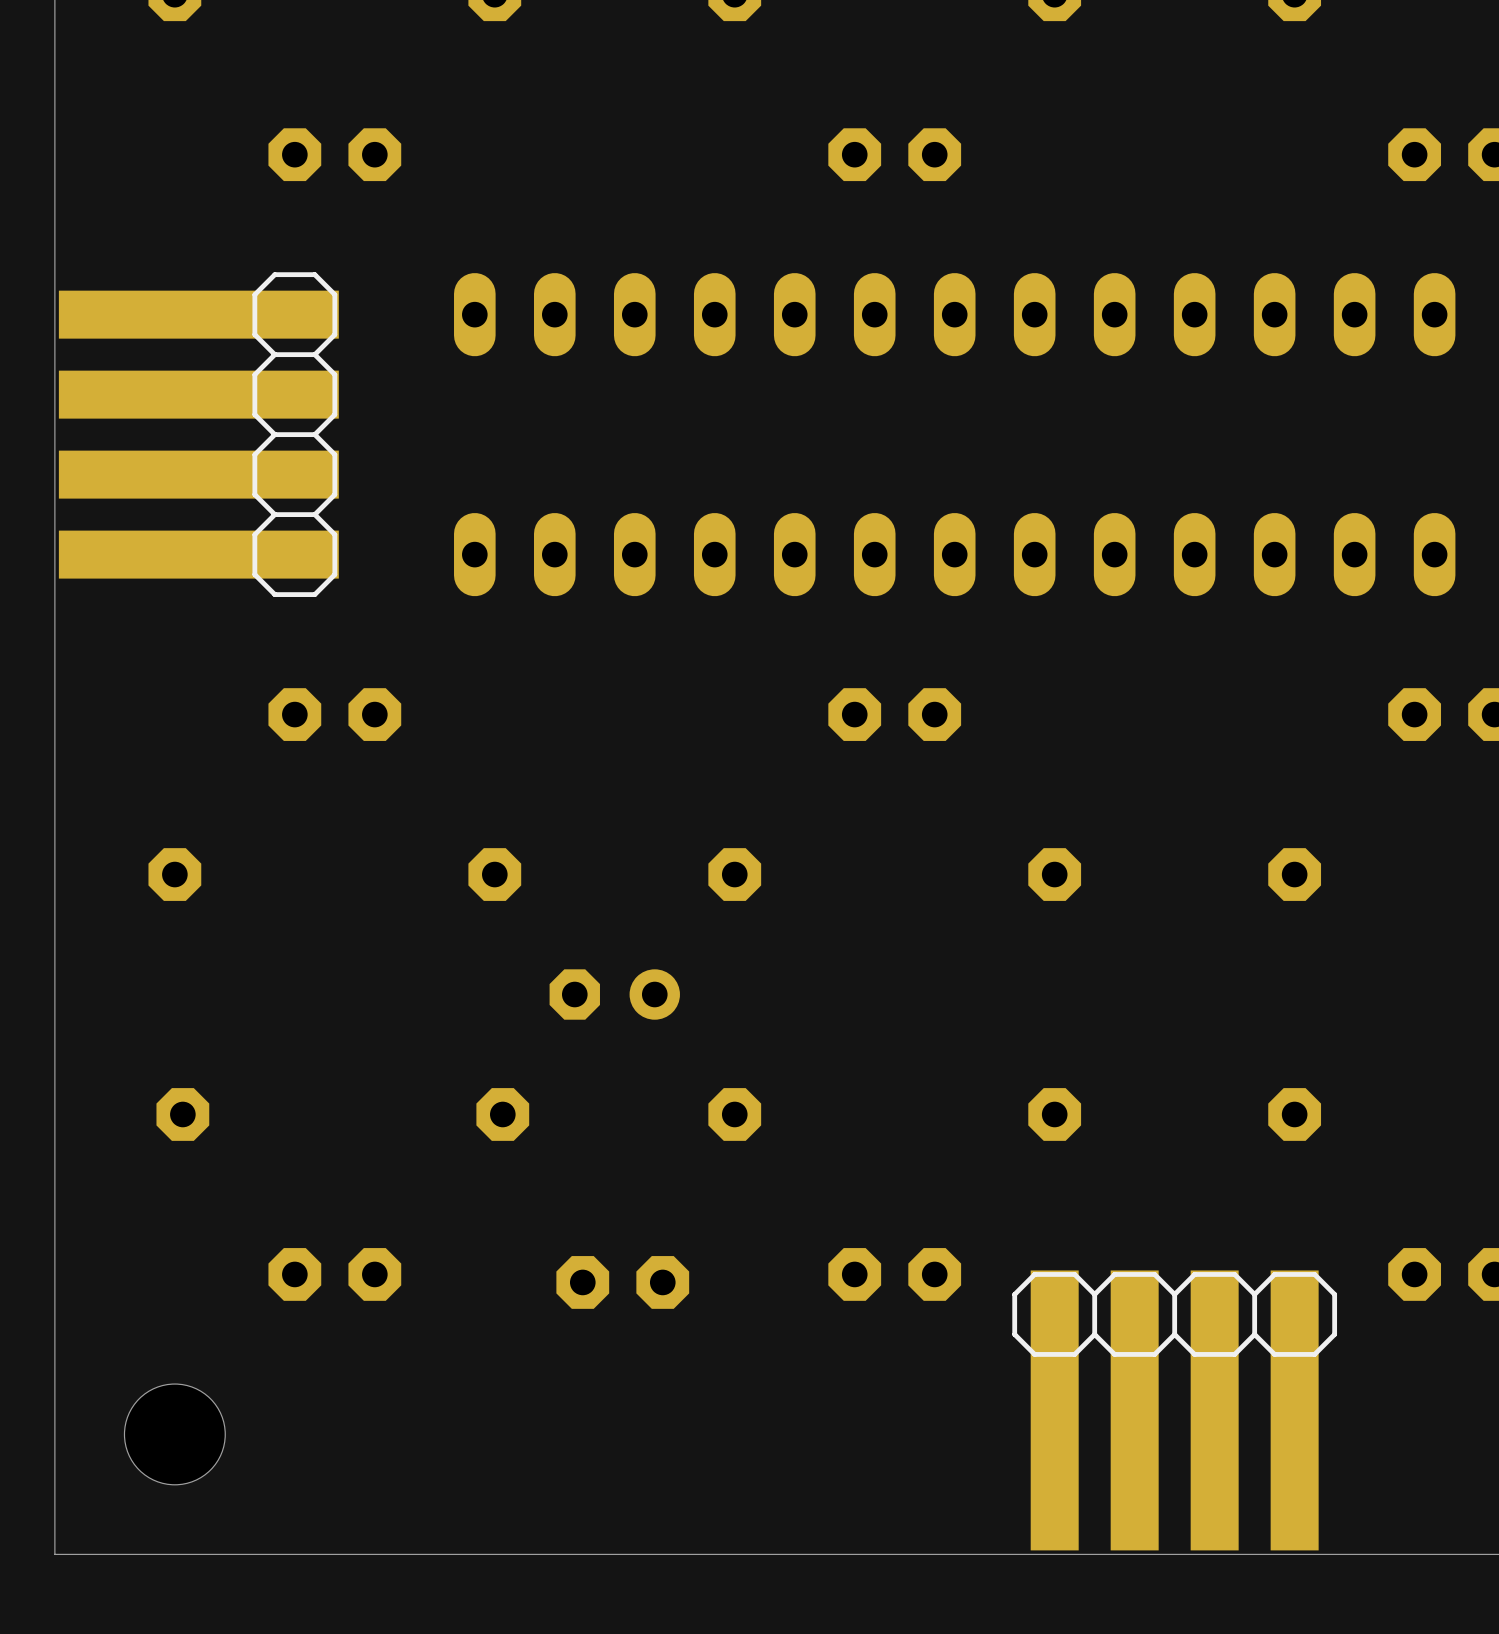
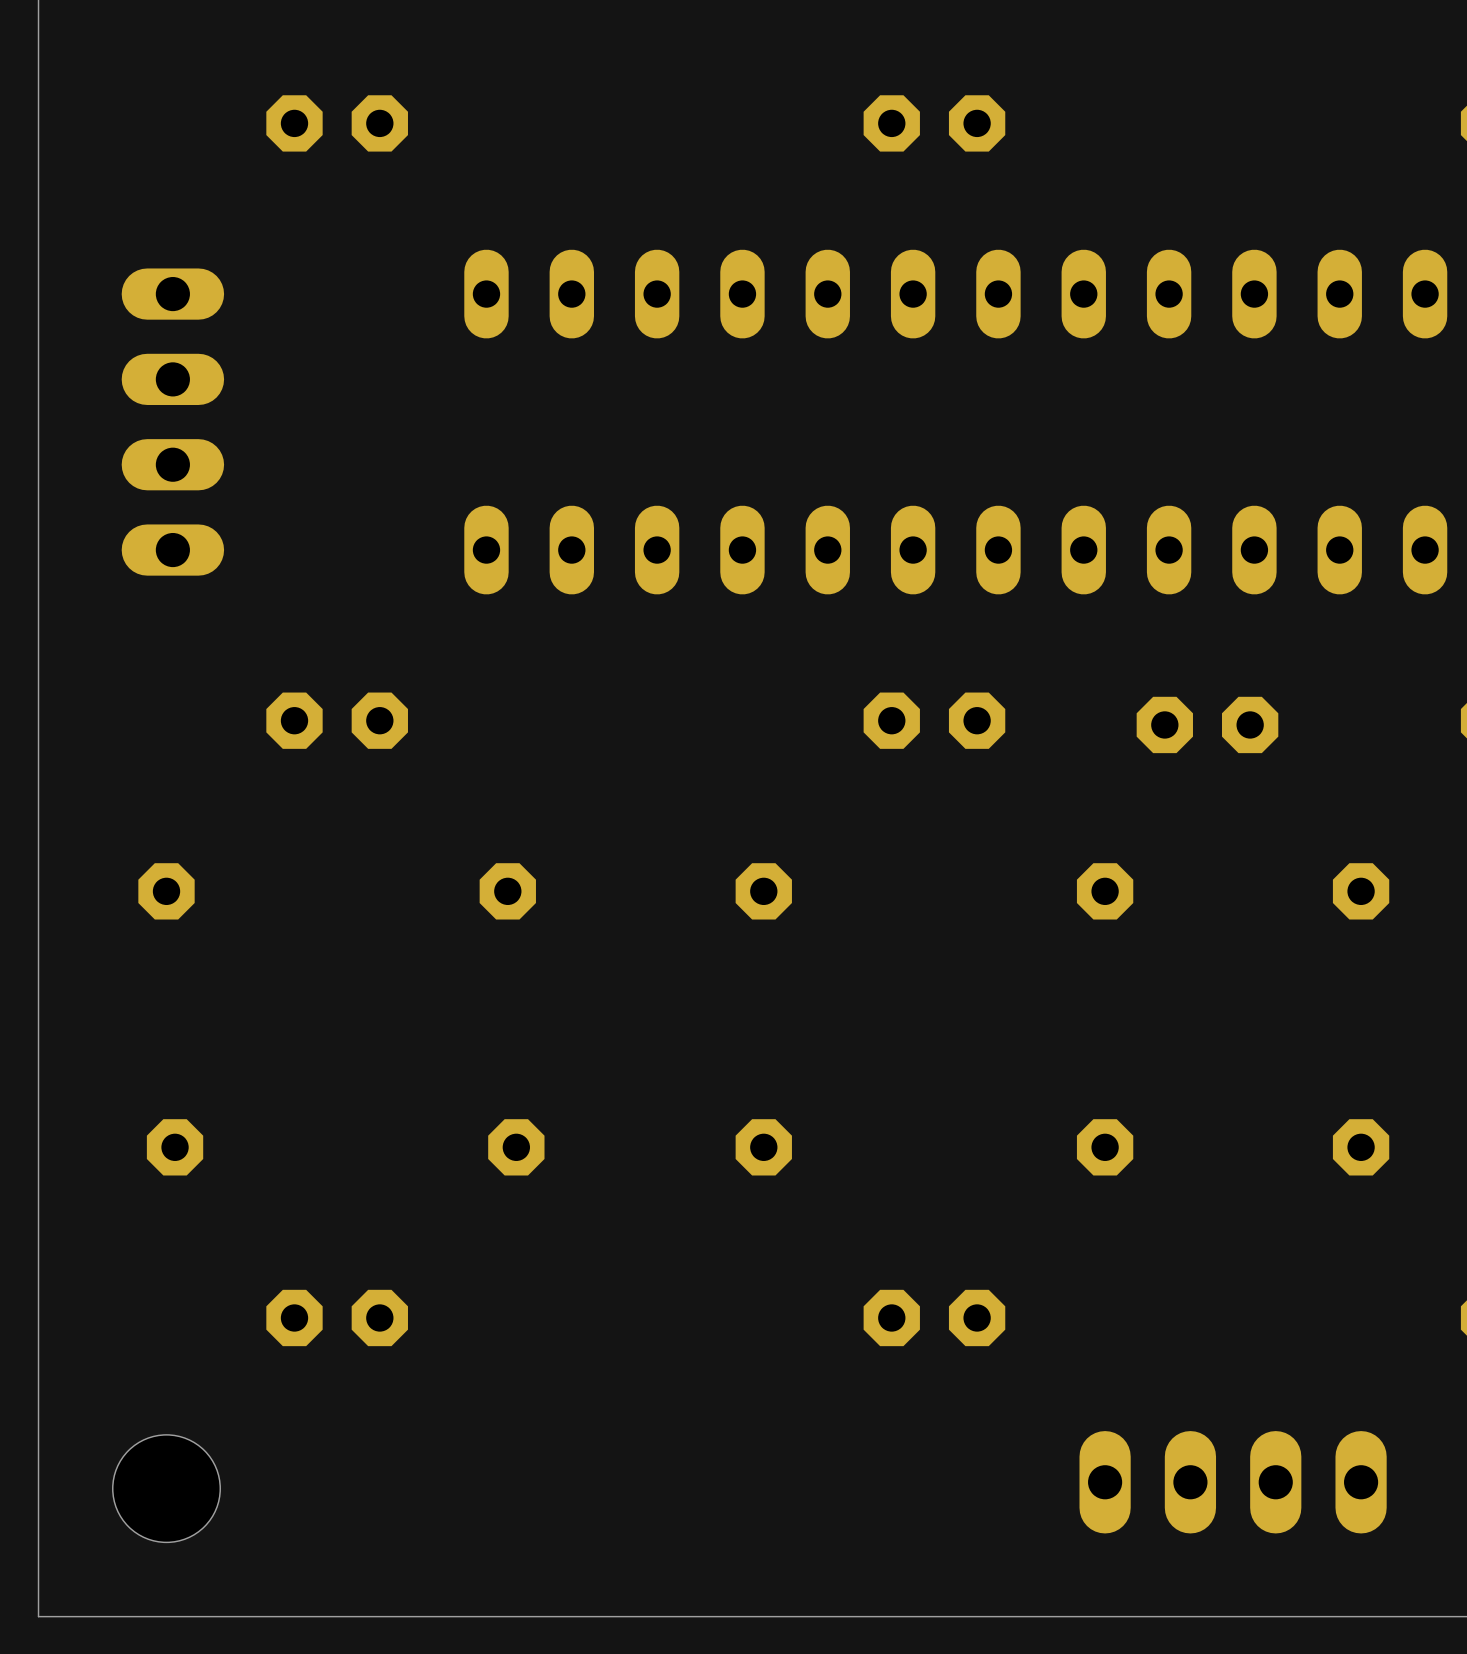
part footprint: [58, 272, 339, 597] -> [121, 268, 225, 576]
part: (614, 994) -> none
part footprint: [1012, 1270, 1338, 1551] -> [1079, 1431, 1387, 1534]
part position: (622, 1282) -> (1207, 724)

